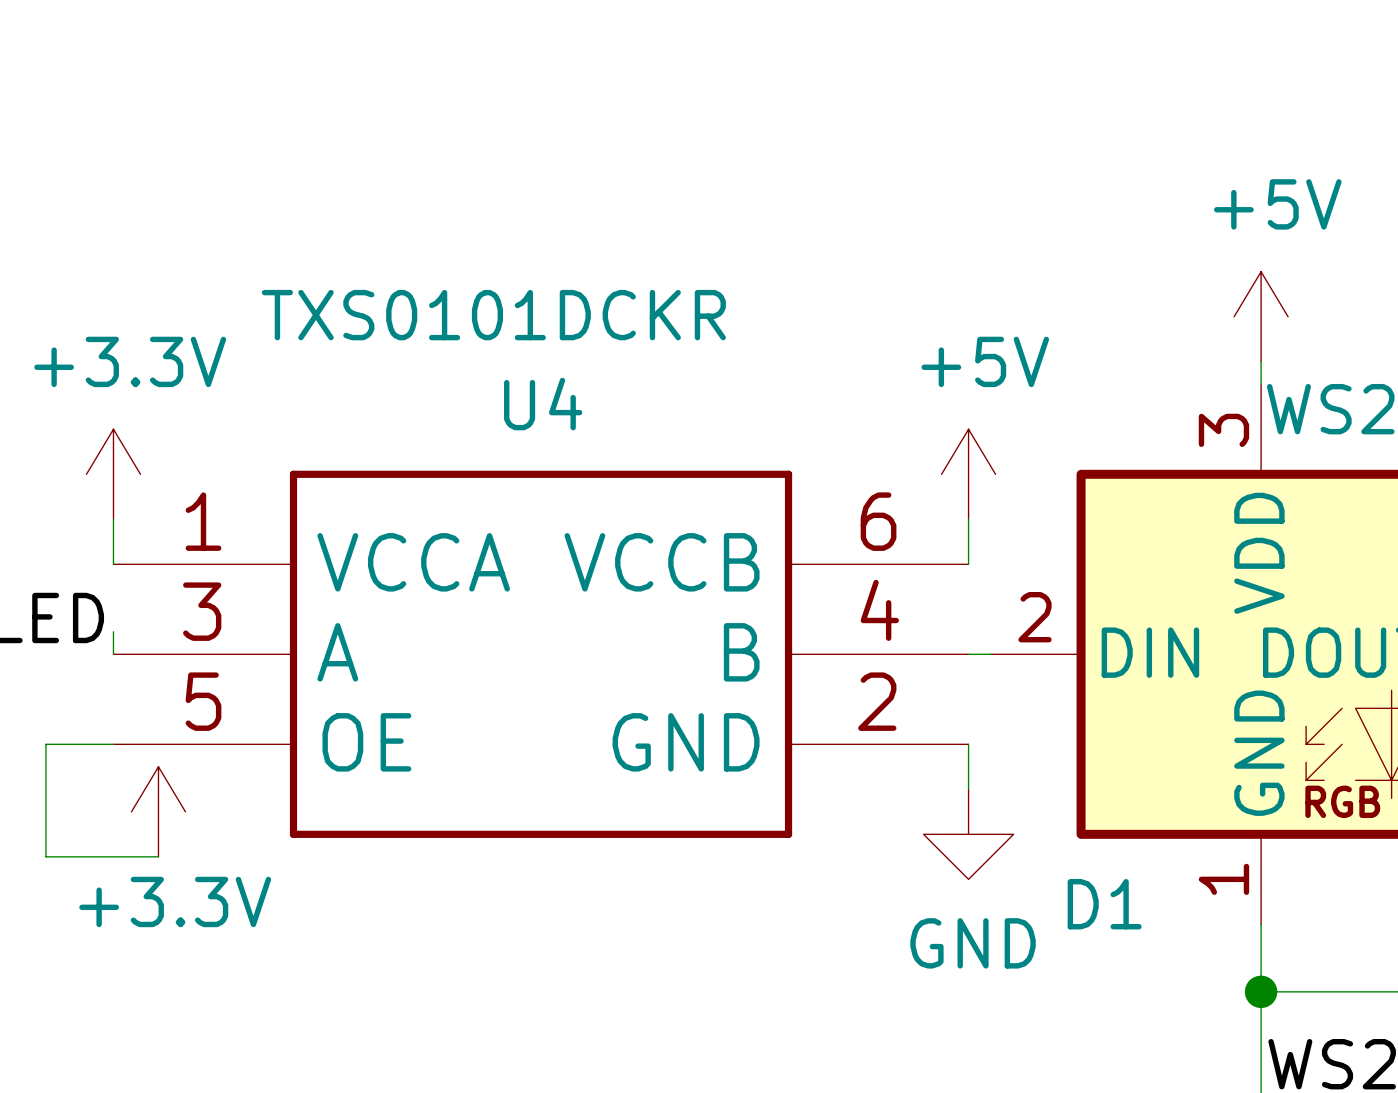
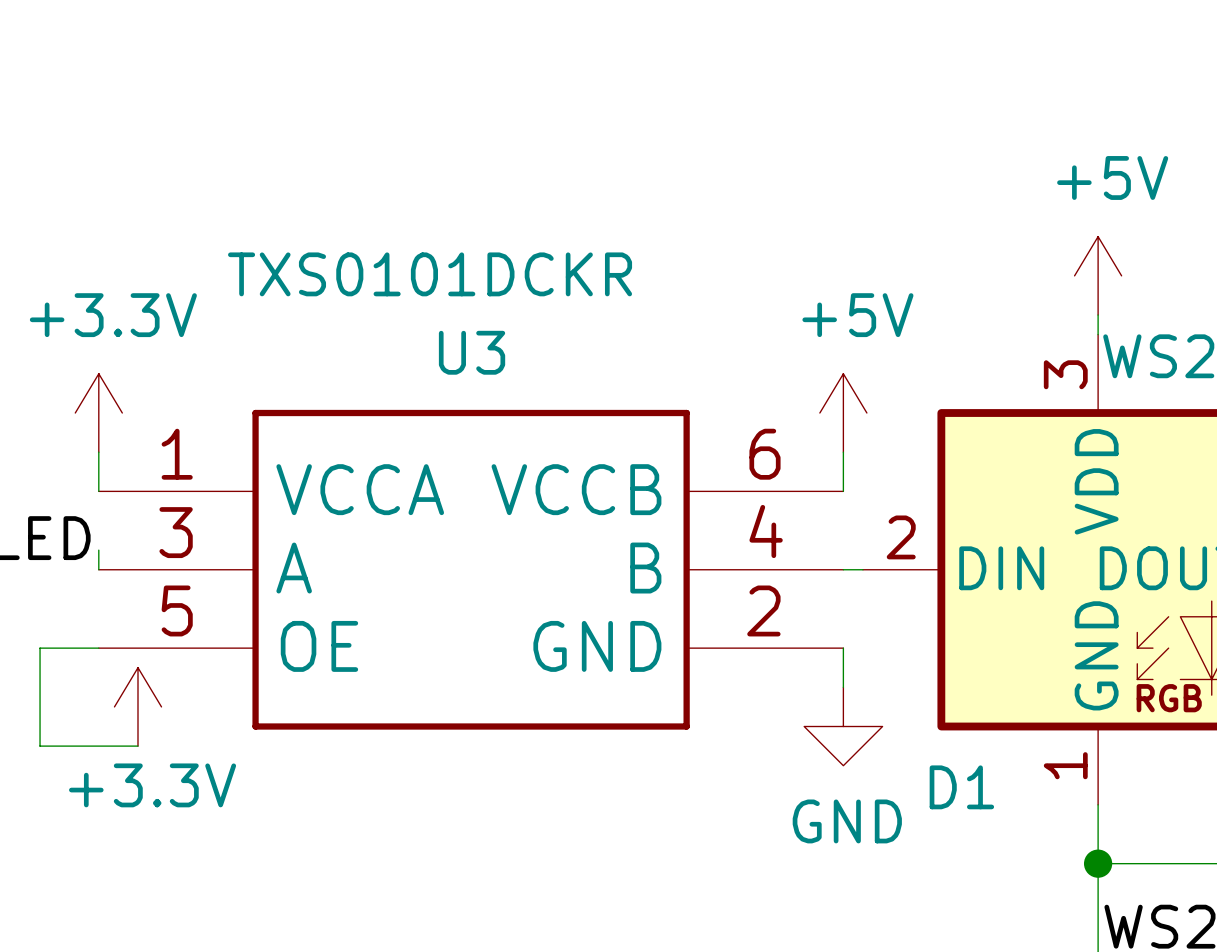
U4 name: U4 (543, 404) -> U3 (472, 352)

